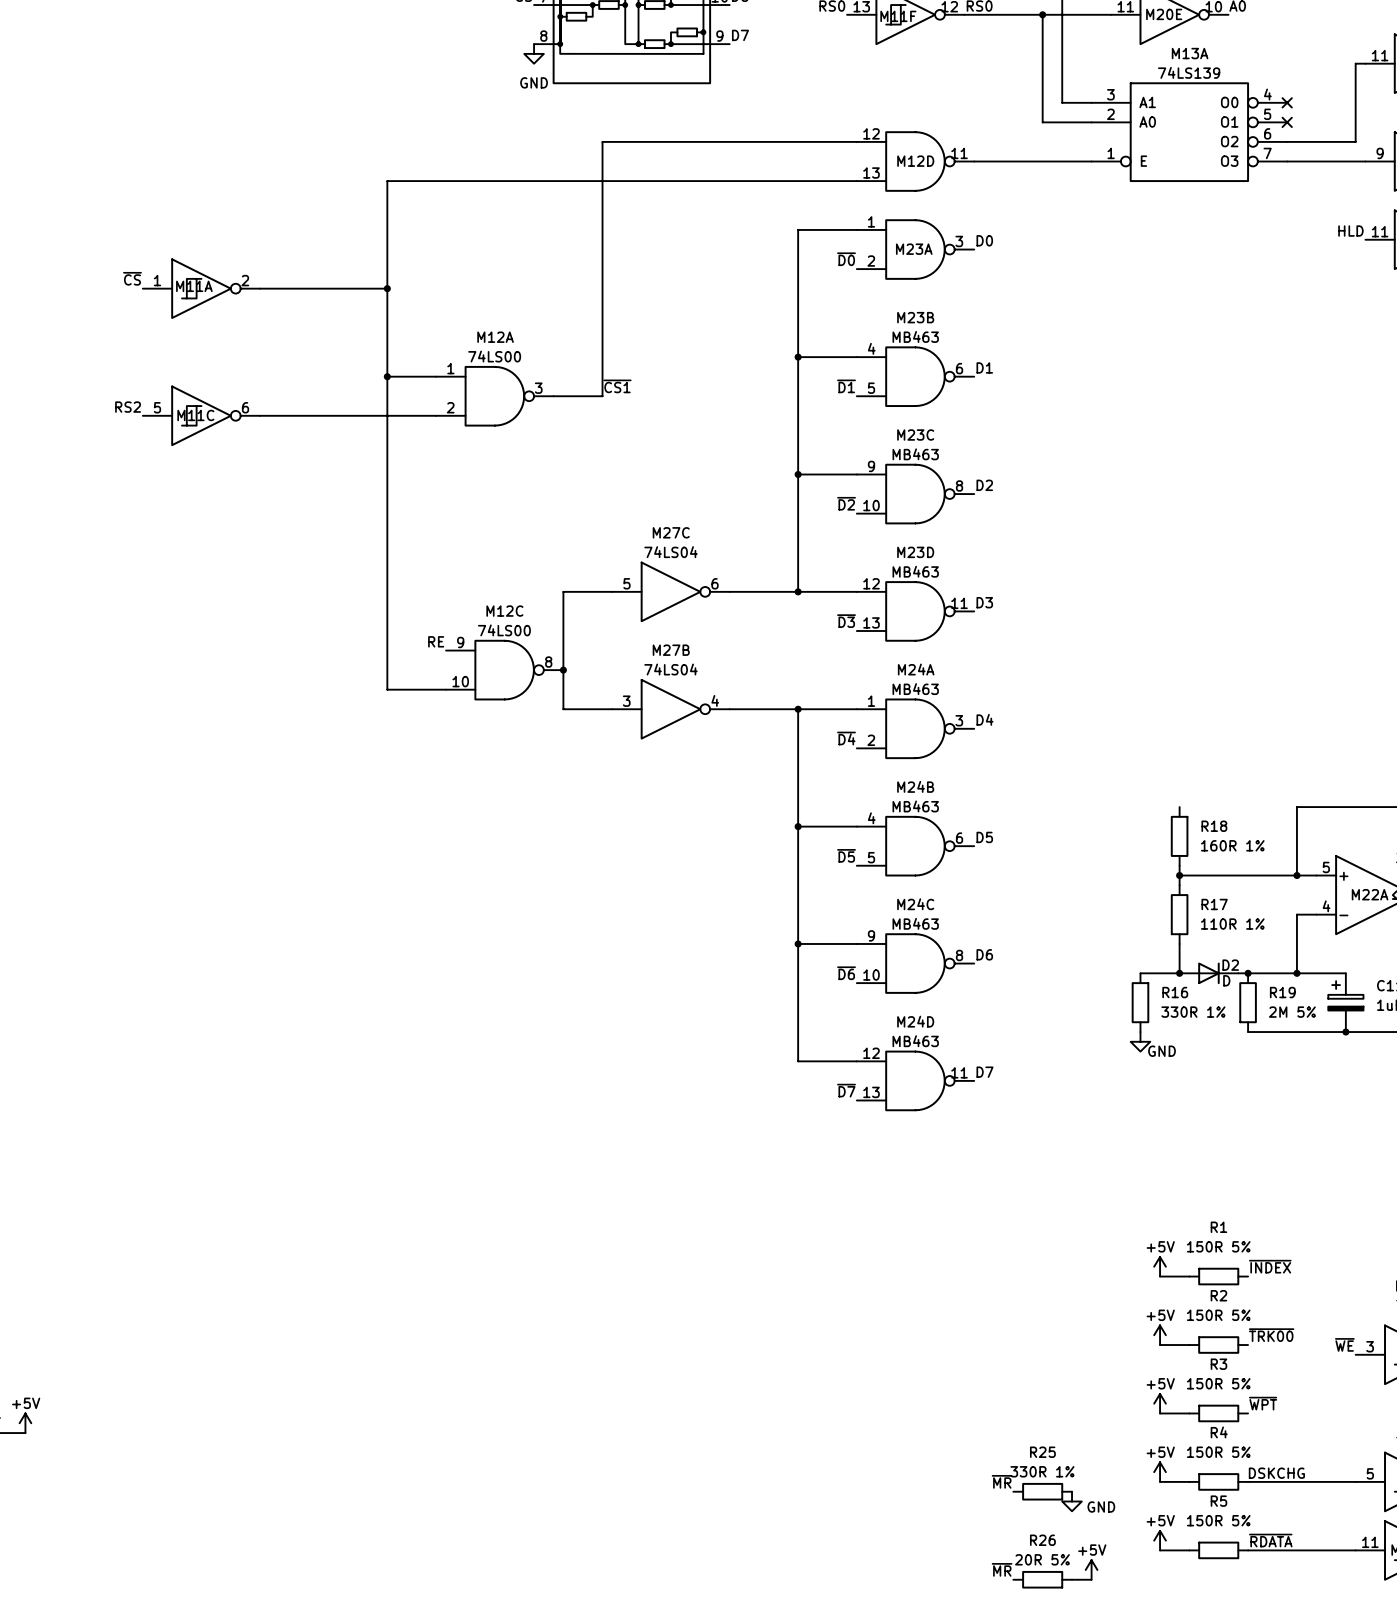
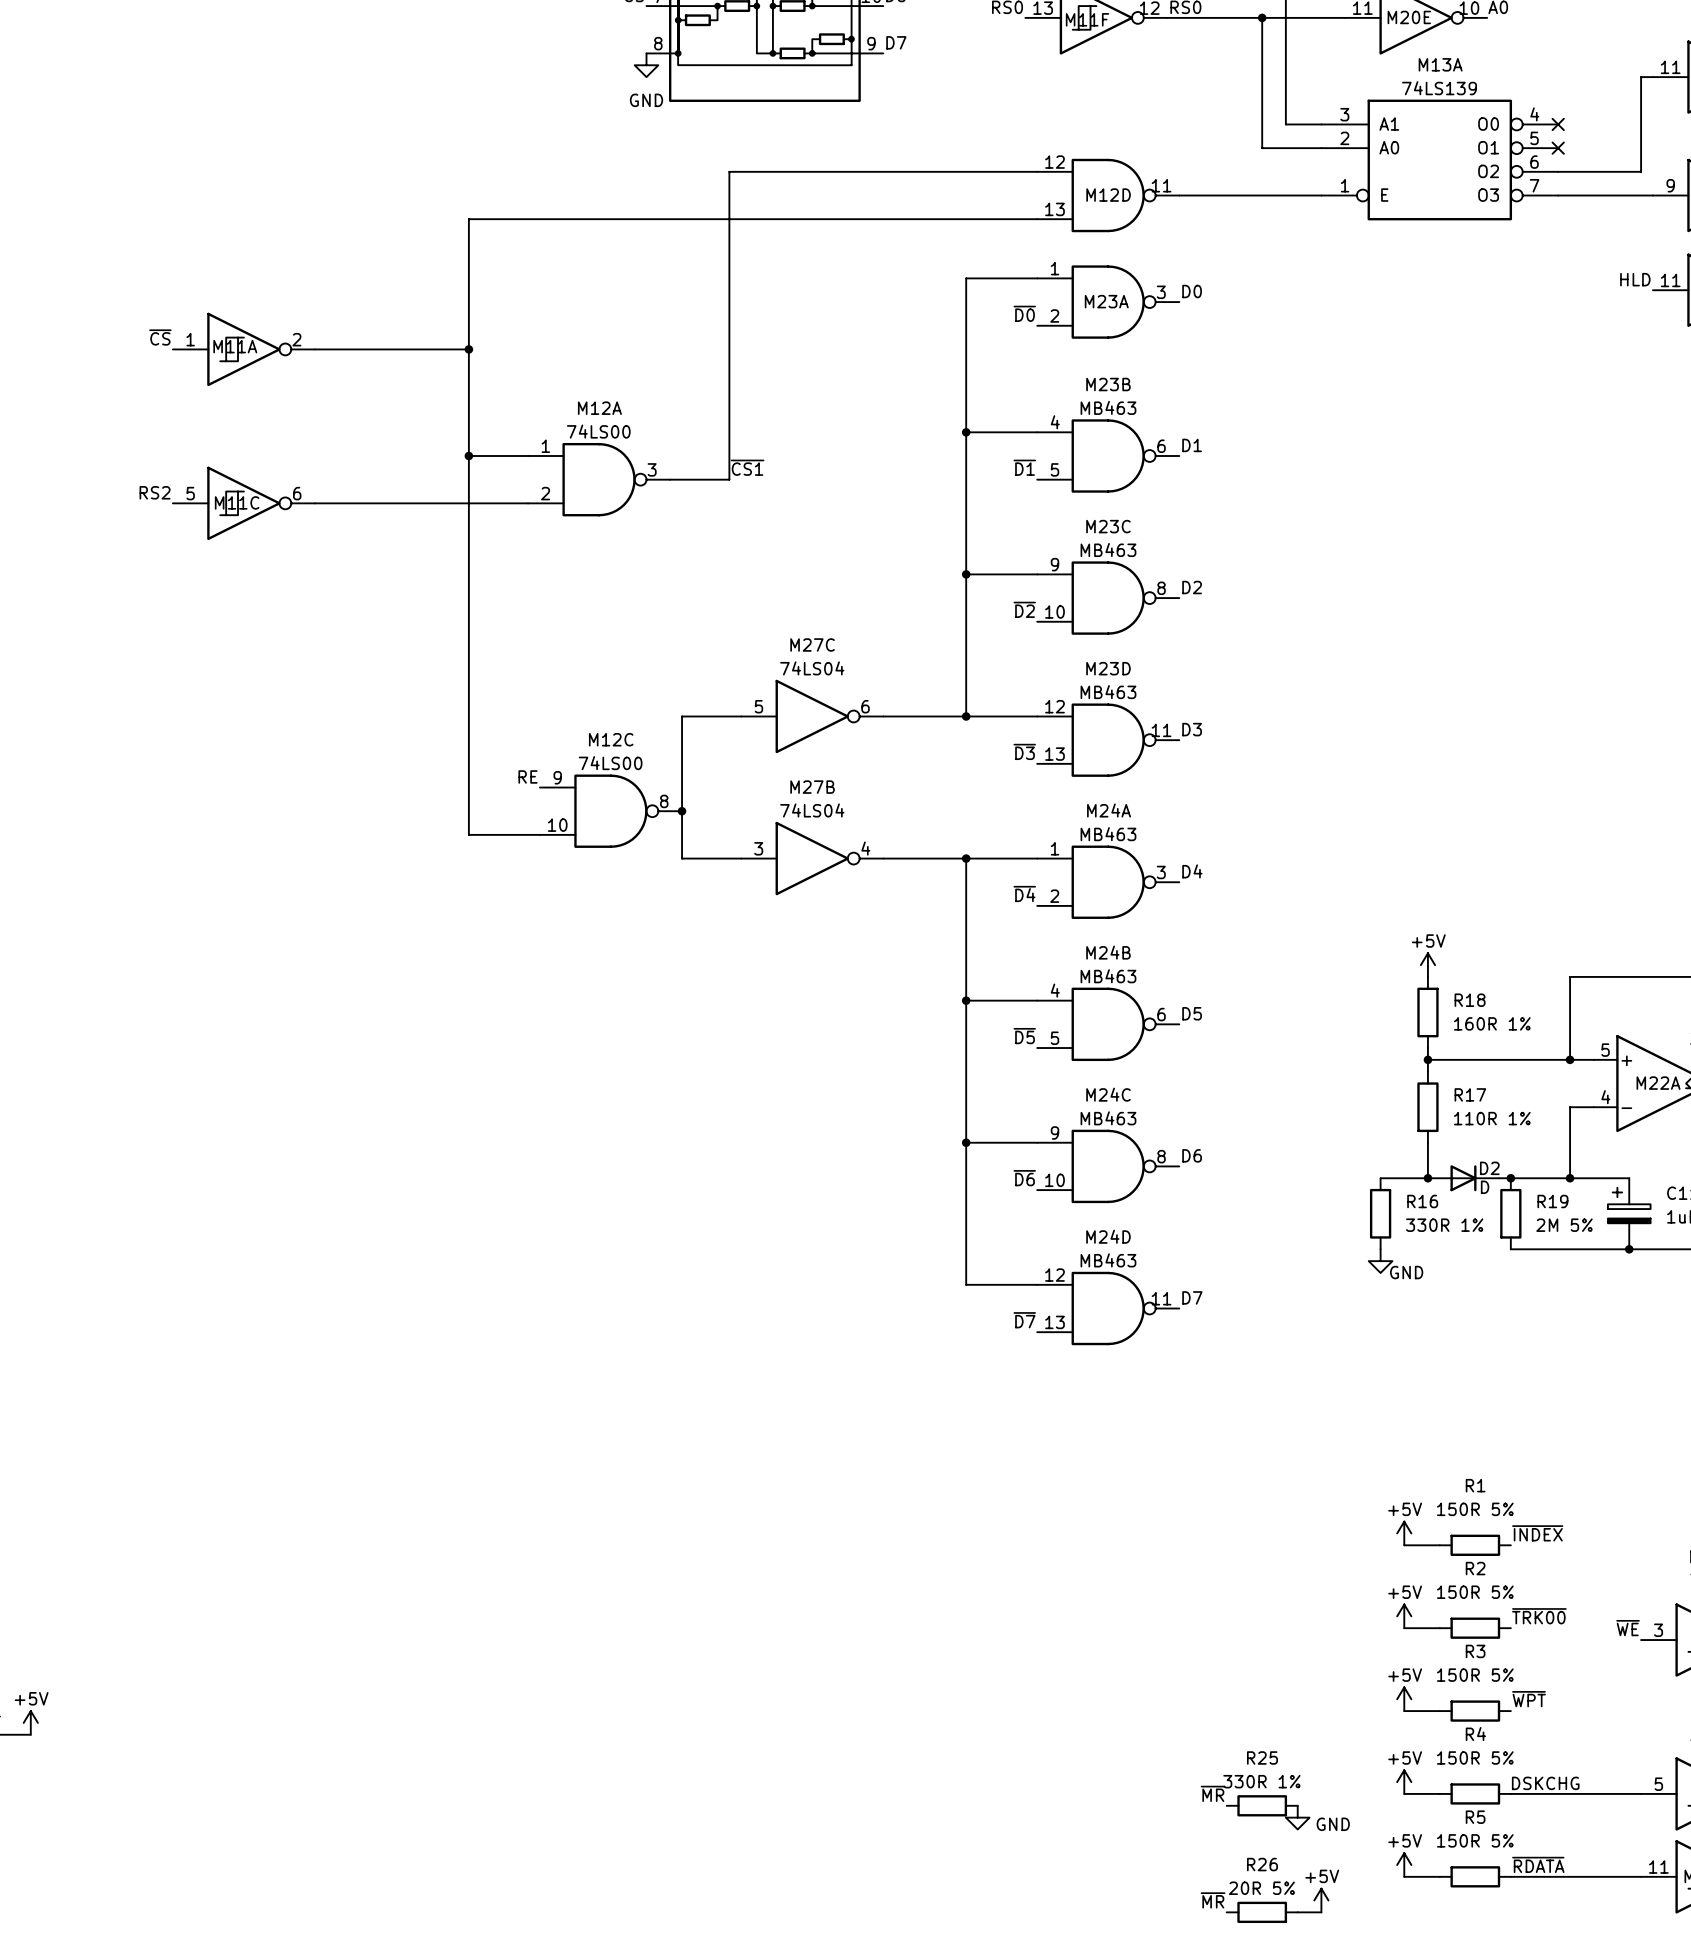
power symbol: none -> +5V (1427, 965)

